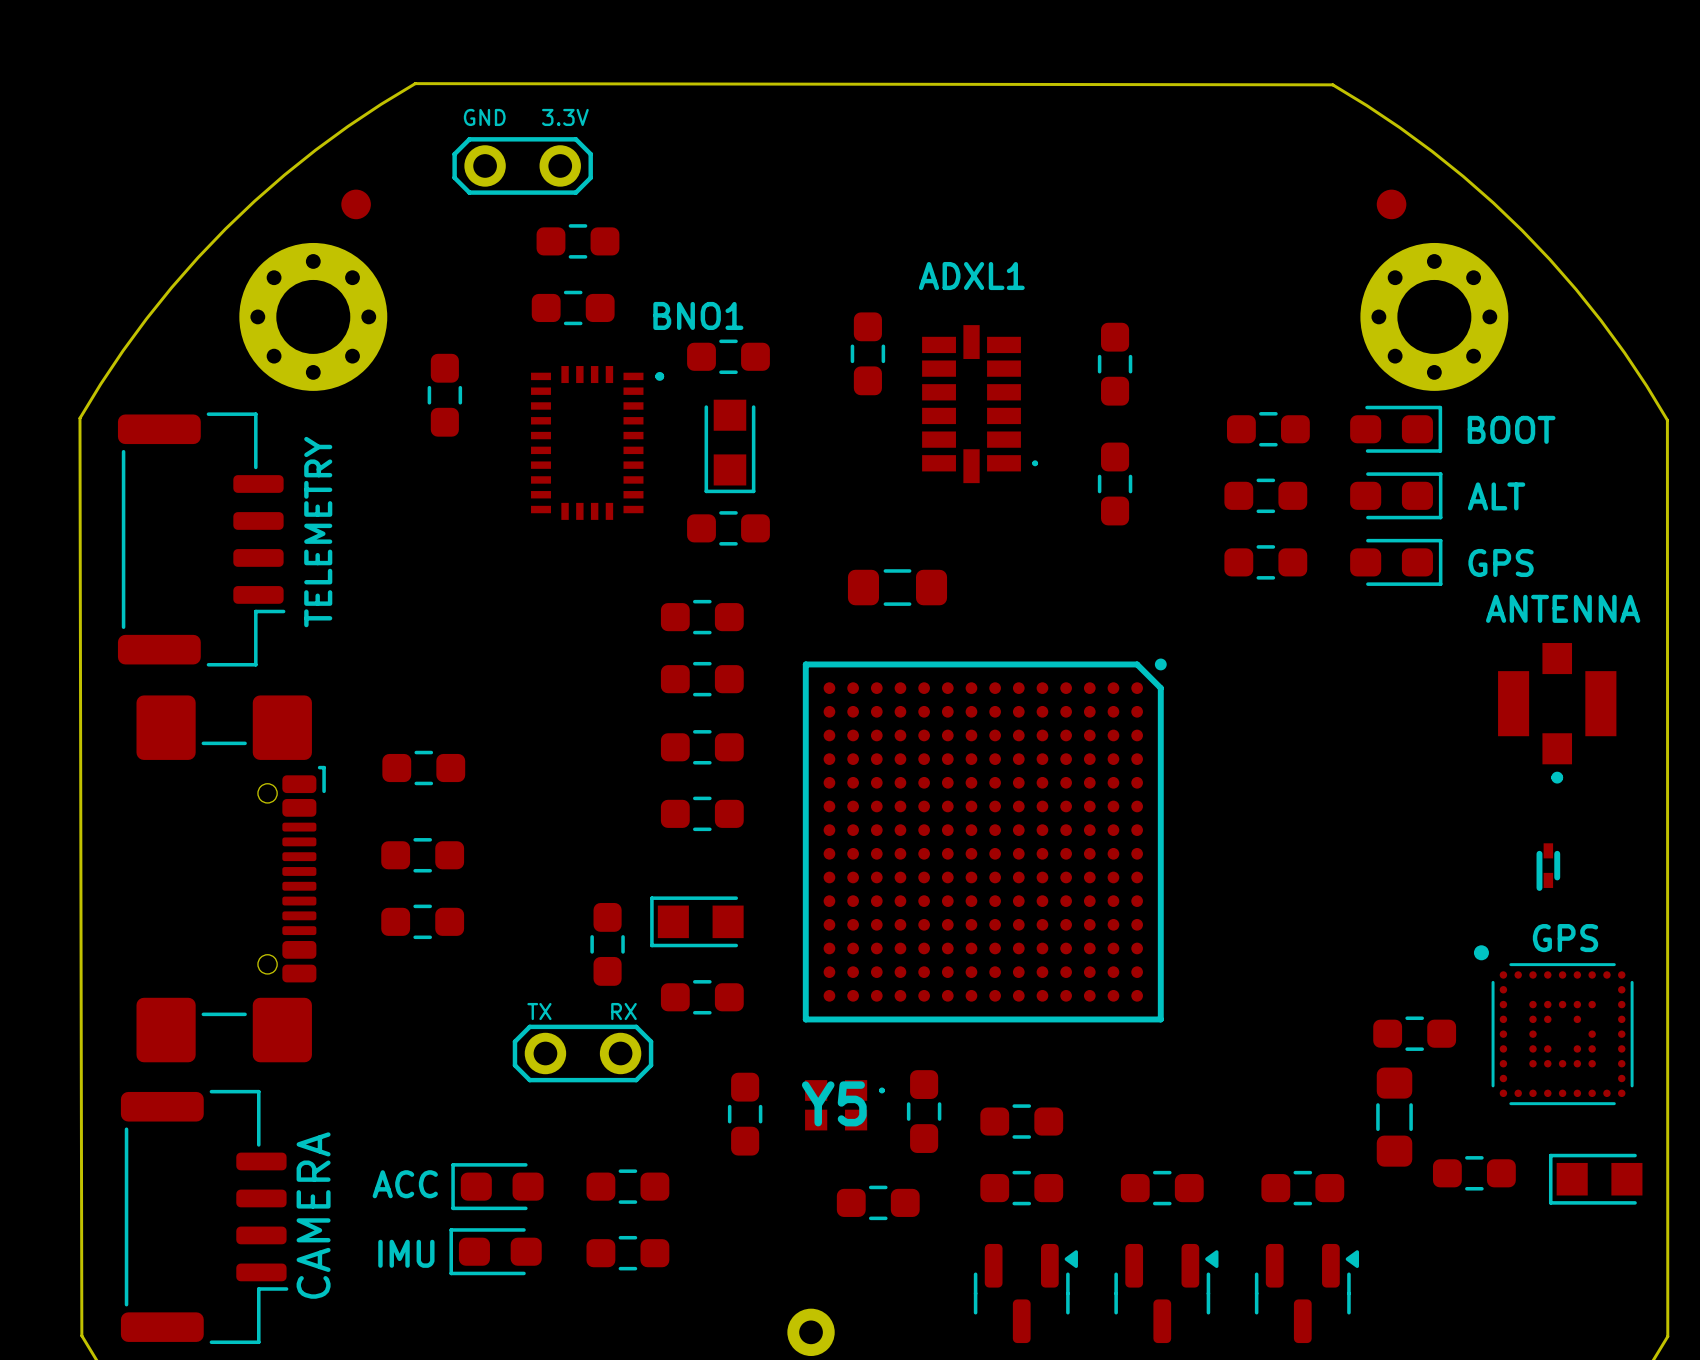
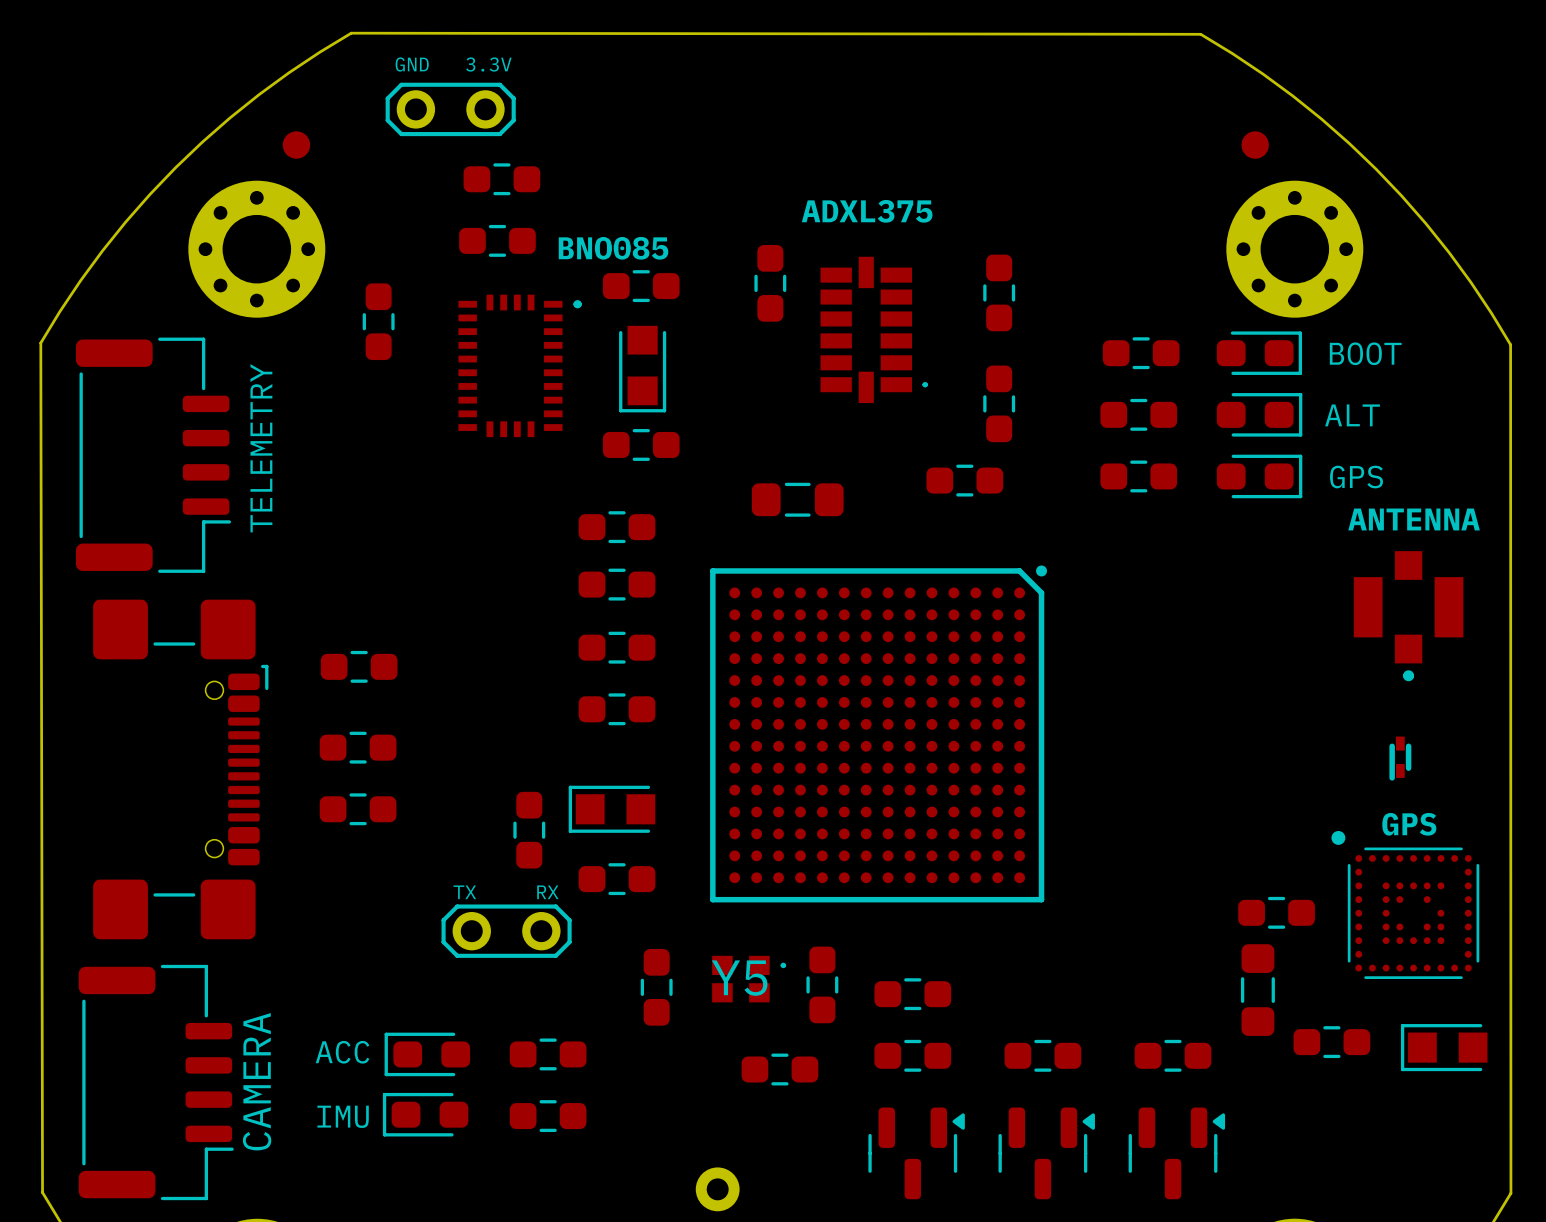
ADXL1 name: ADXL1 (971, 276) -> ADXL375 (867, 211)
BNO1 name: BNO1 (698, 315) -> BNO085 (613, 248)
part: none -> (964, 480)

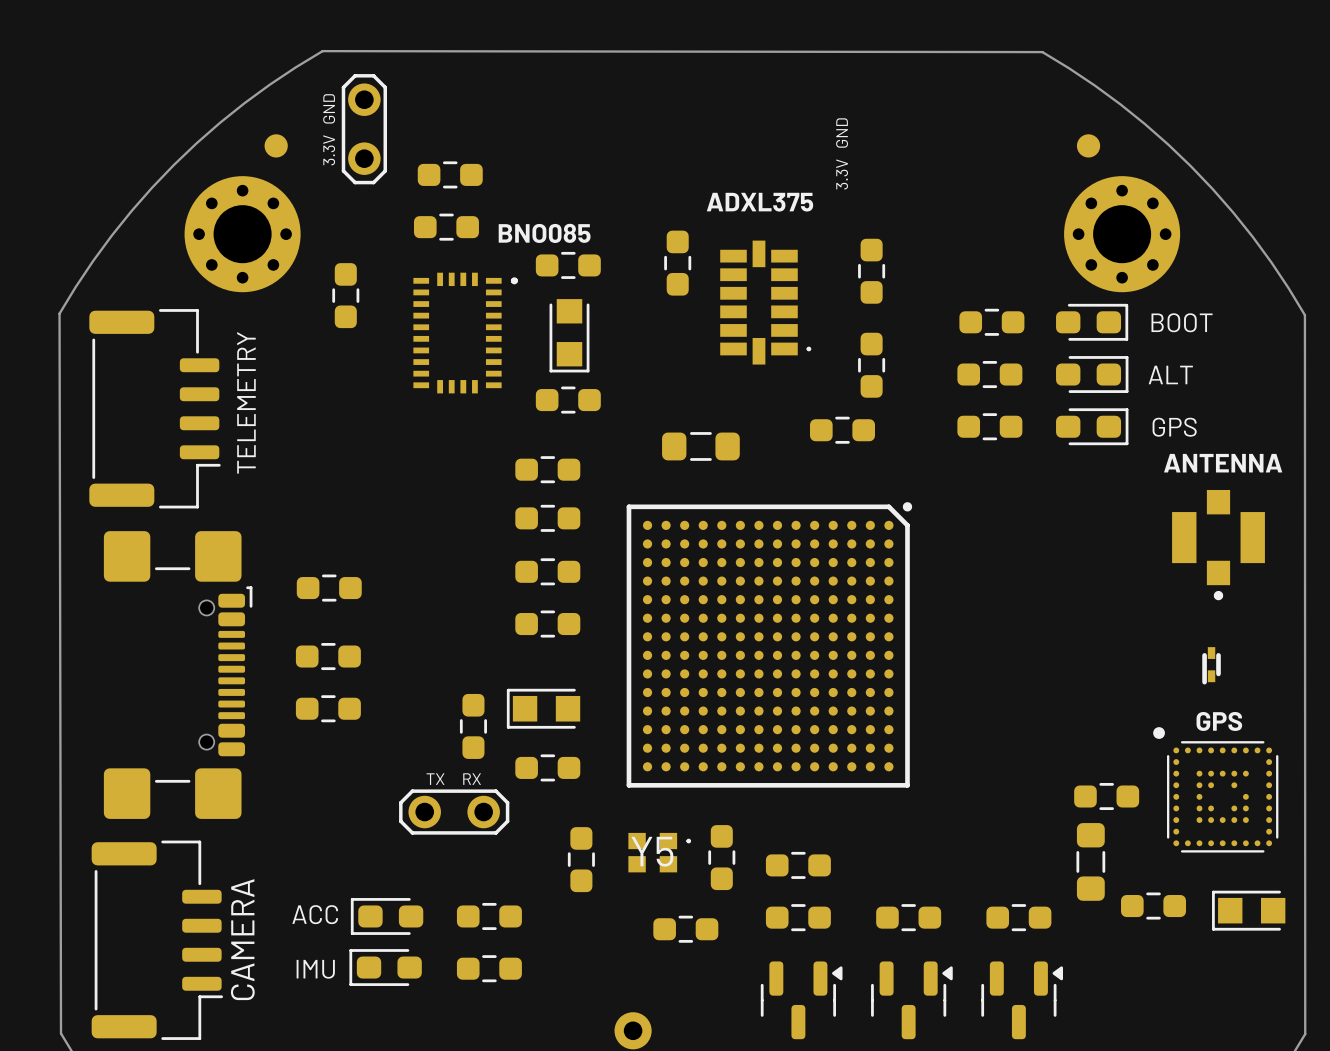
text: GND 3.3V (453, 64) -> none
part rotation: 0° (450, 109) -> 90° clockwise (364, 129)
text: none -> 3.3V GND (329, 129)
text: none -> 3.3V GND (842, 153)

